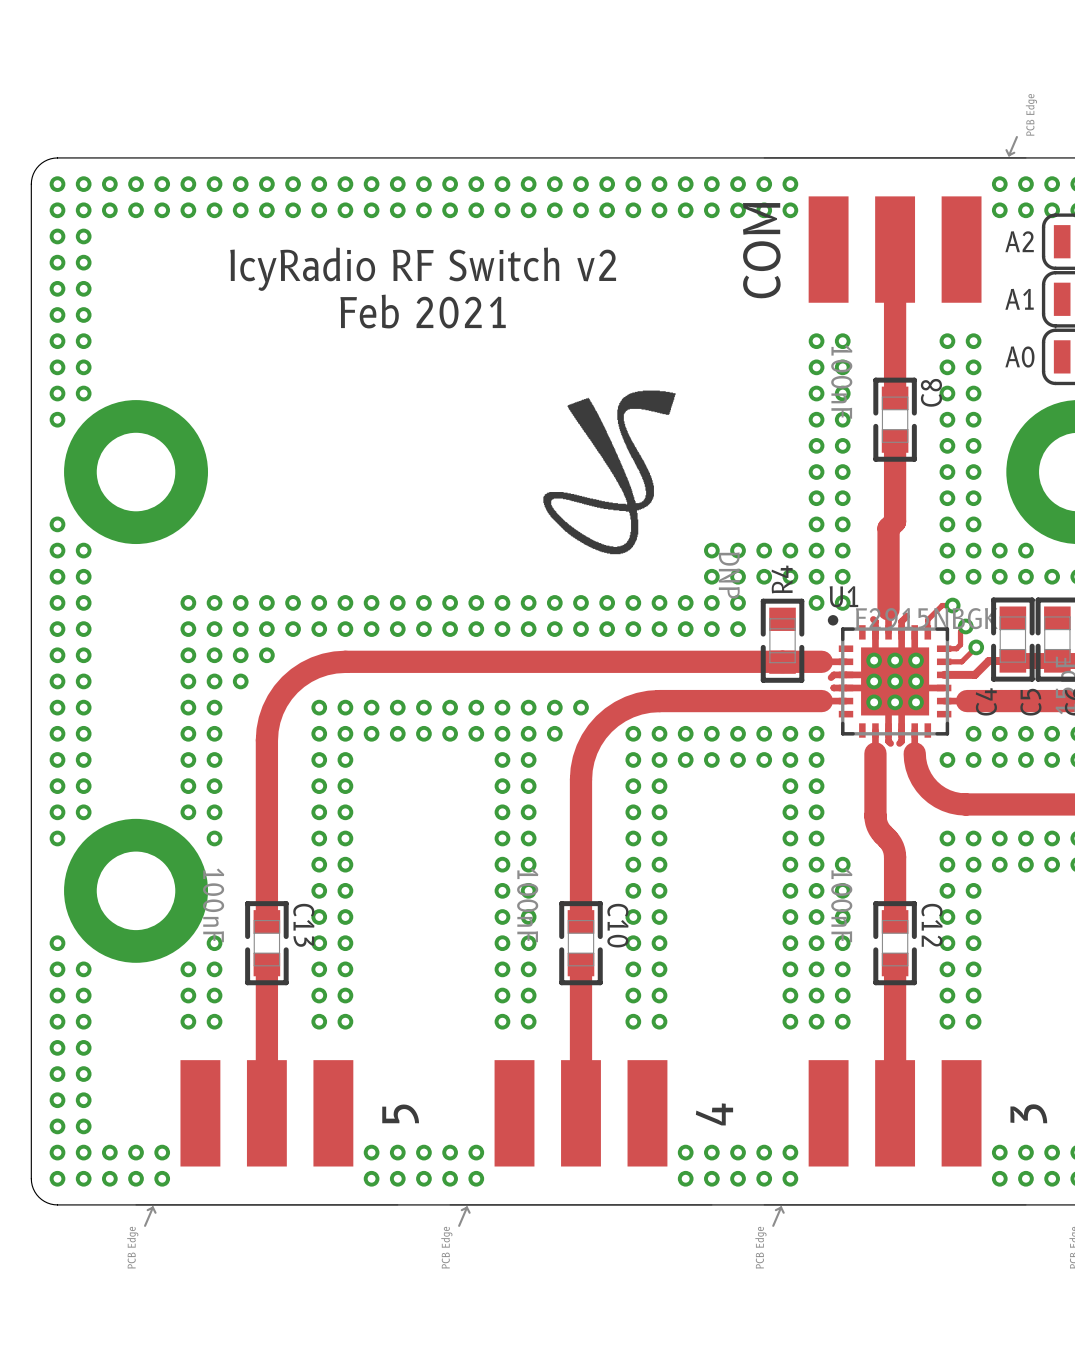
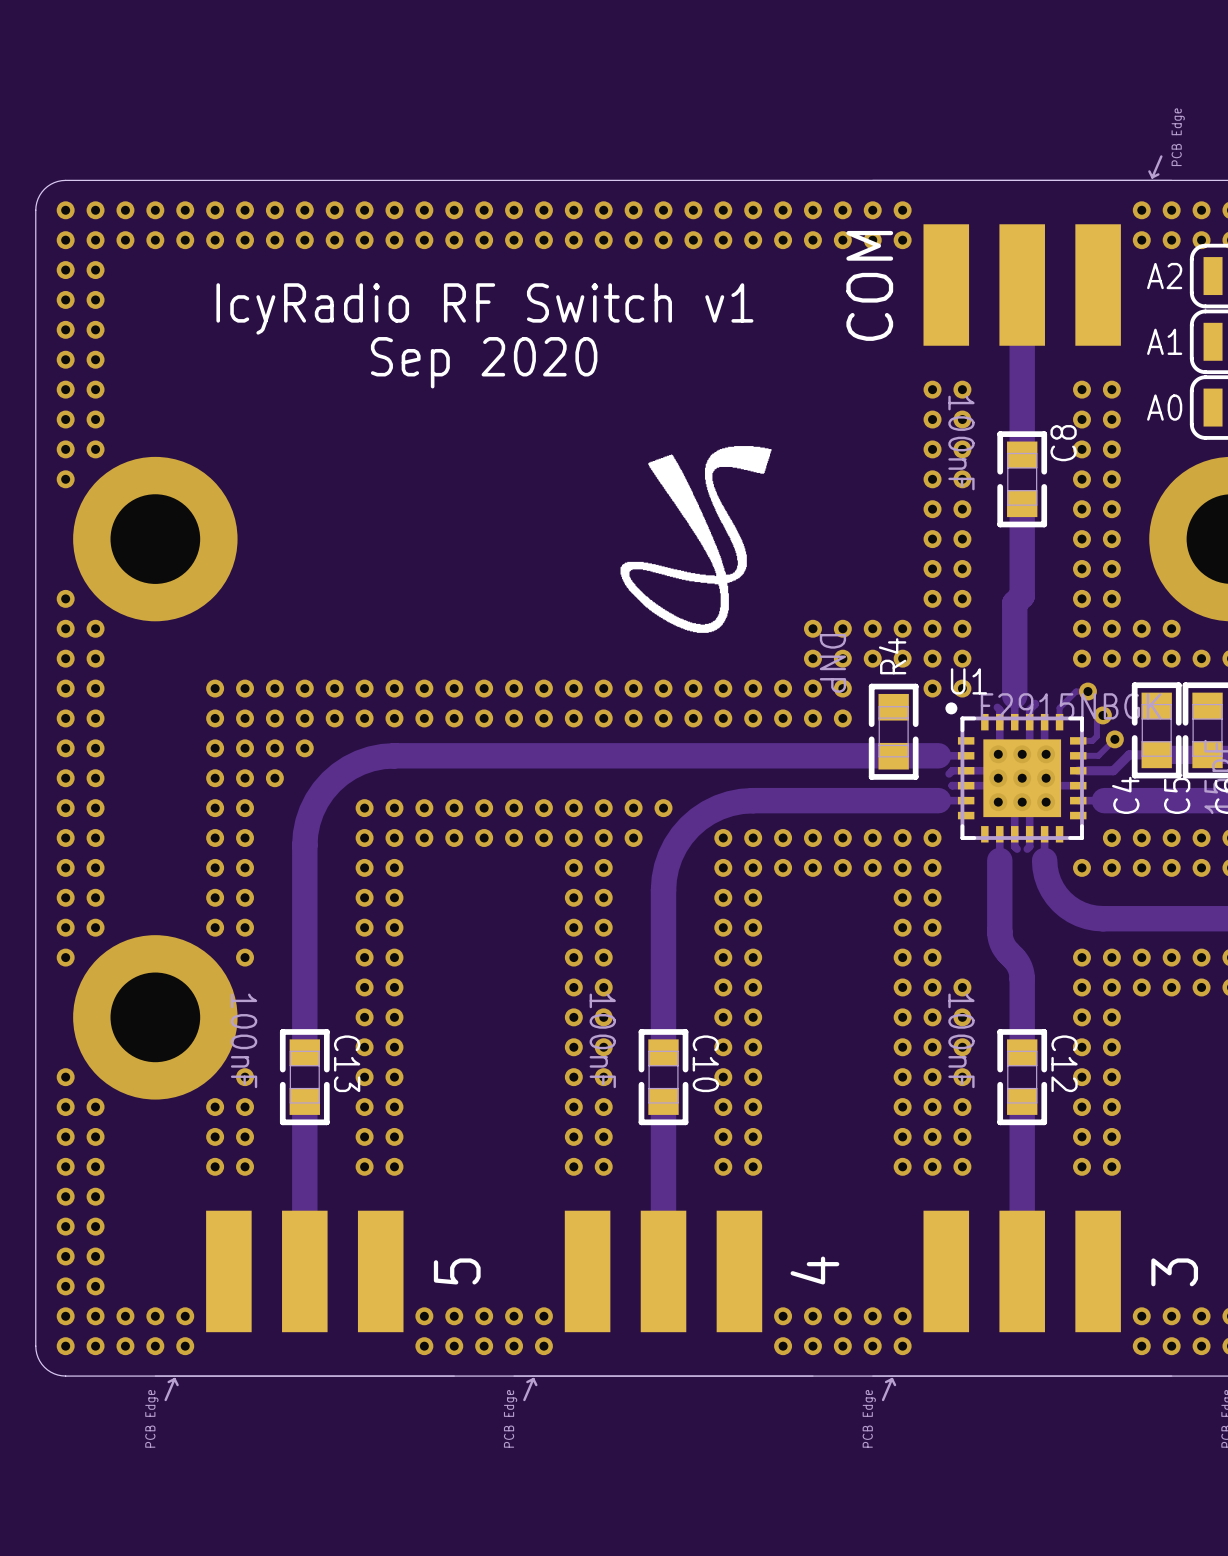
text: IcyRadio RF Switch v2 (423, 269) -> IcyRadio RF Switch v1 (484, 308)
text: Feb 2021 (423, 311) -> Sep 2020 (484, 362)

